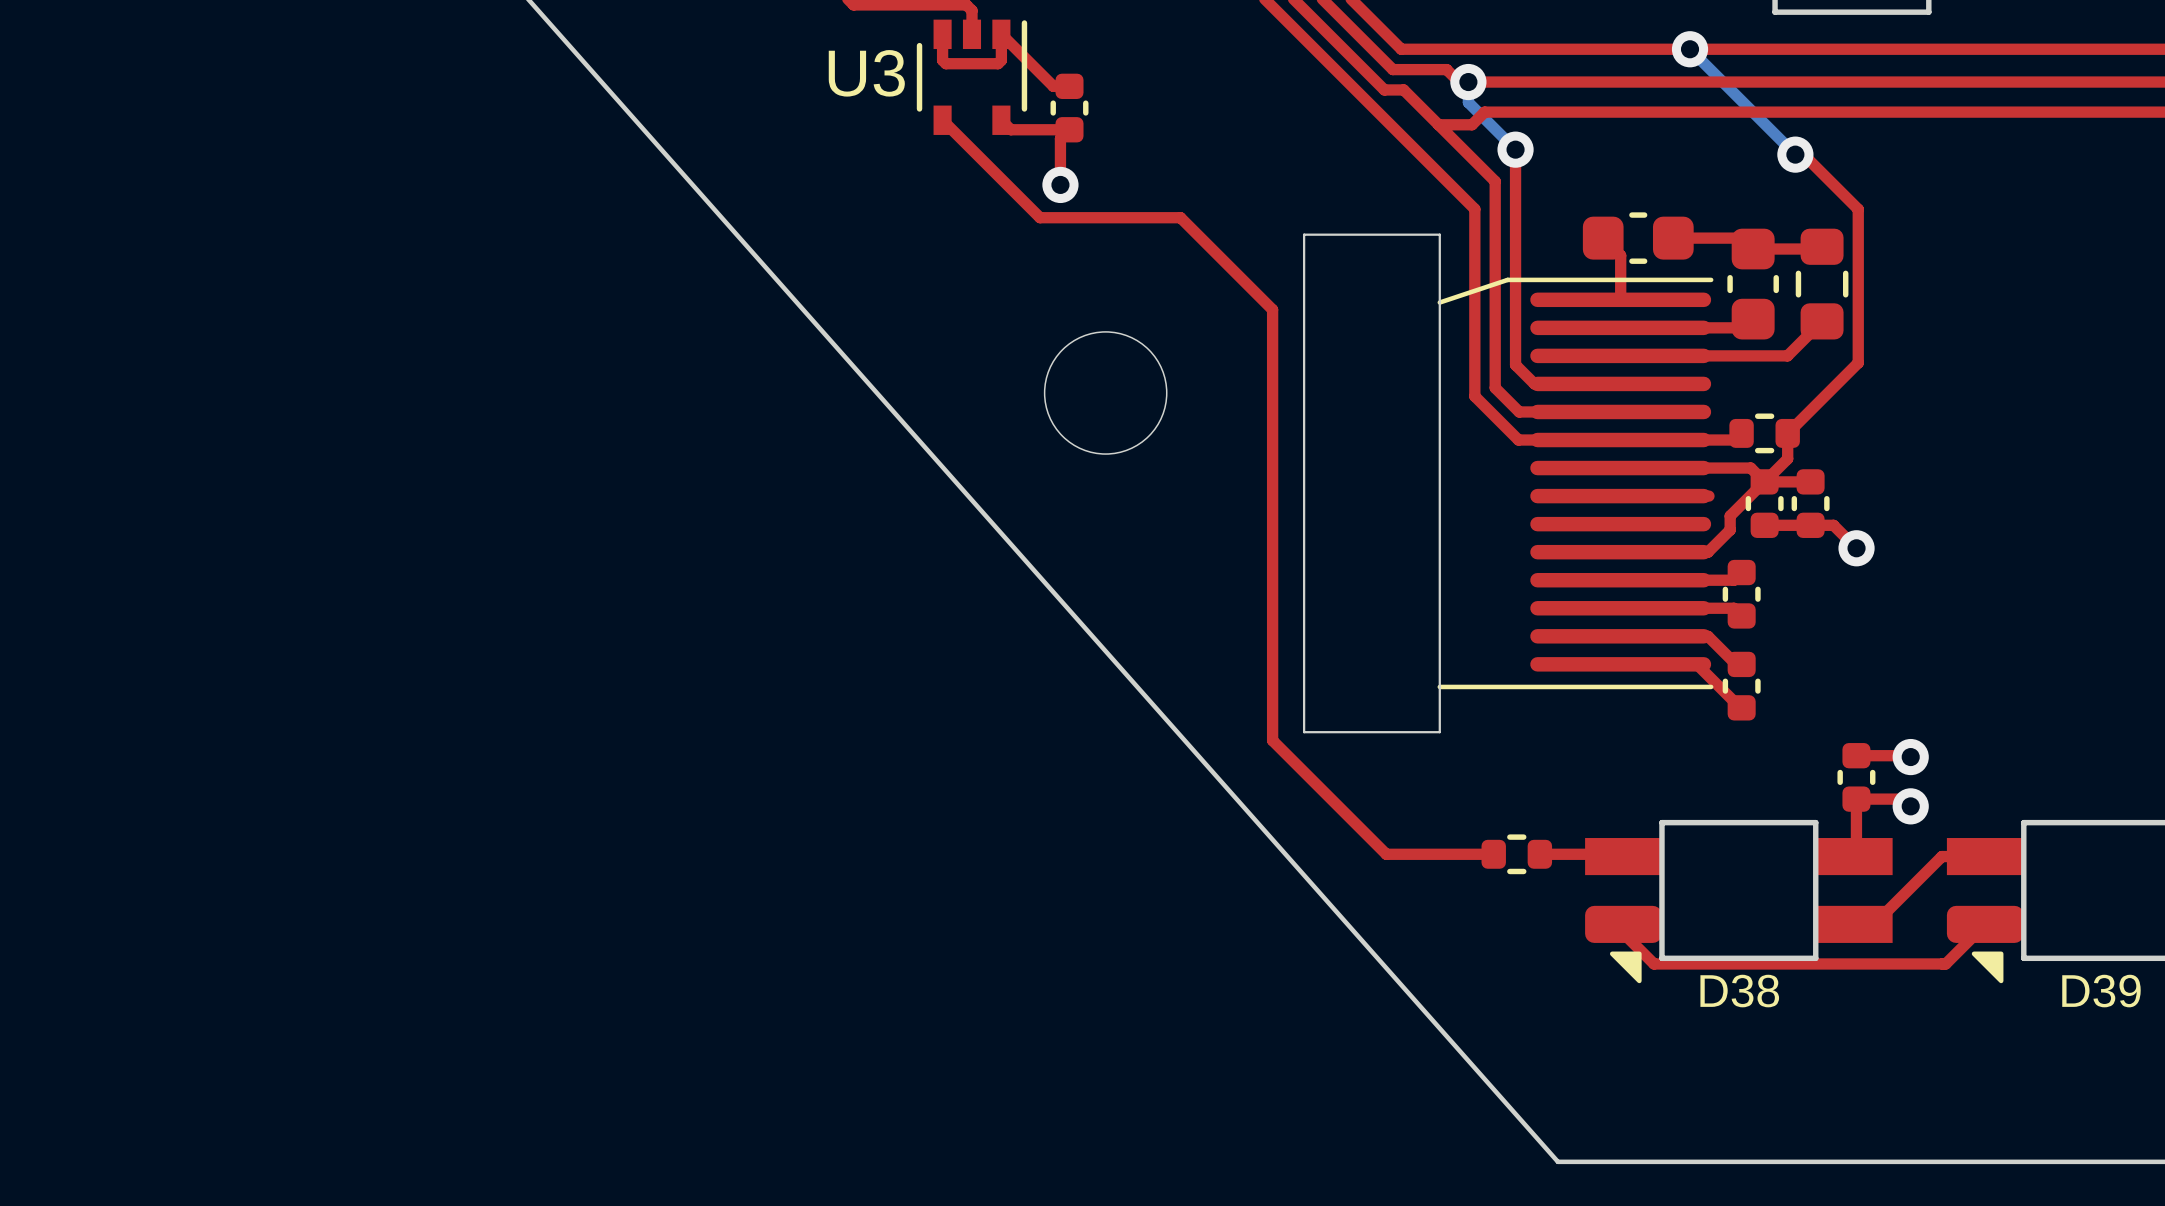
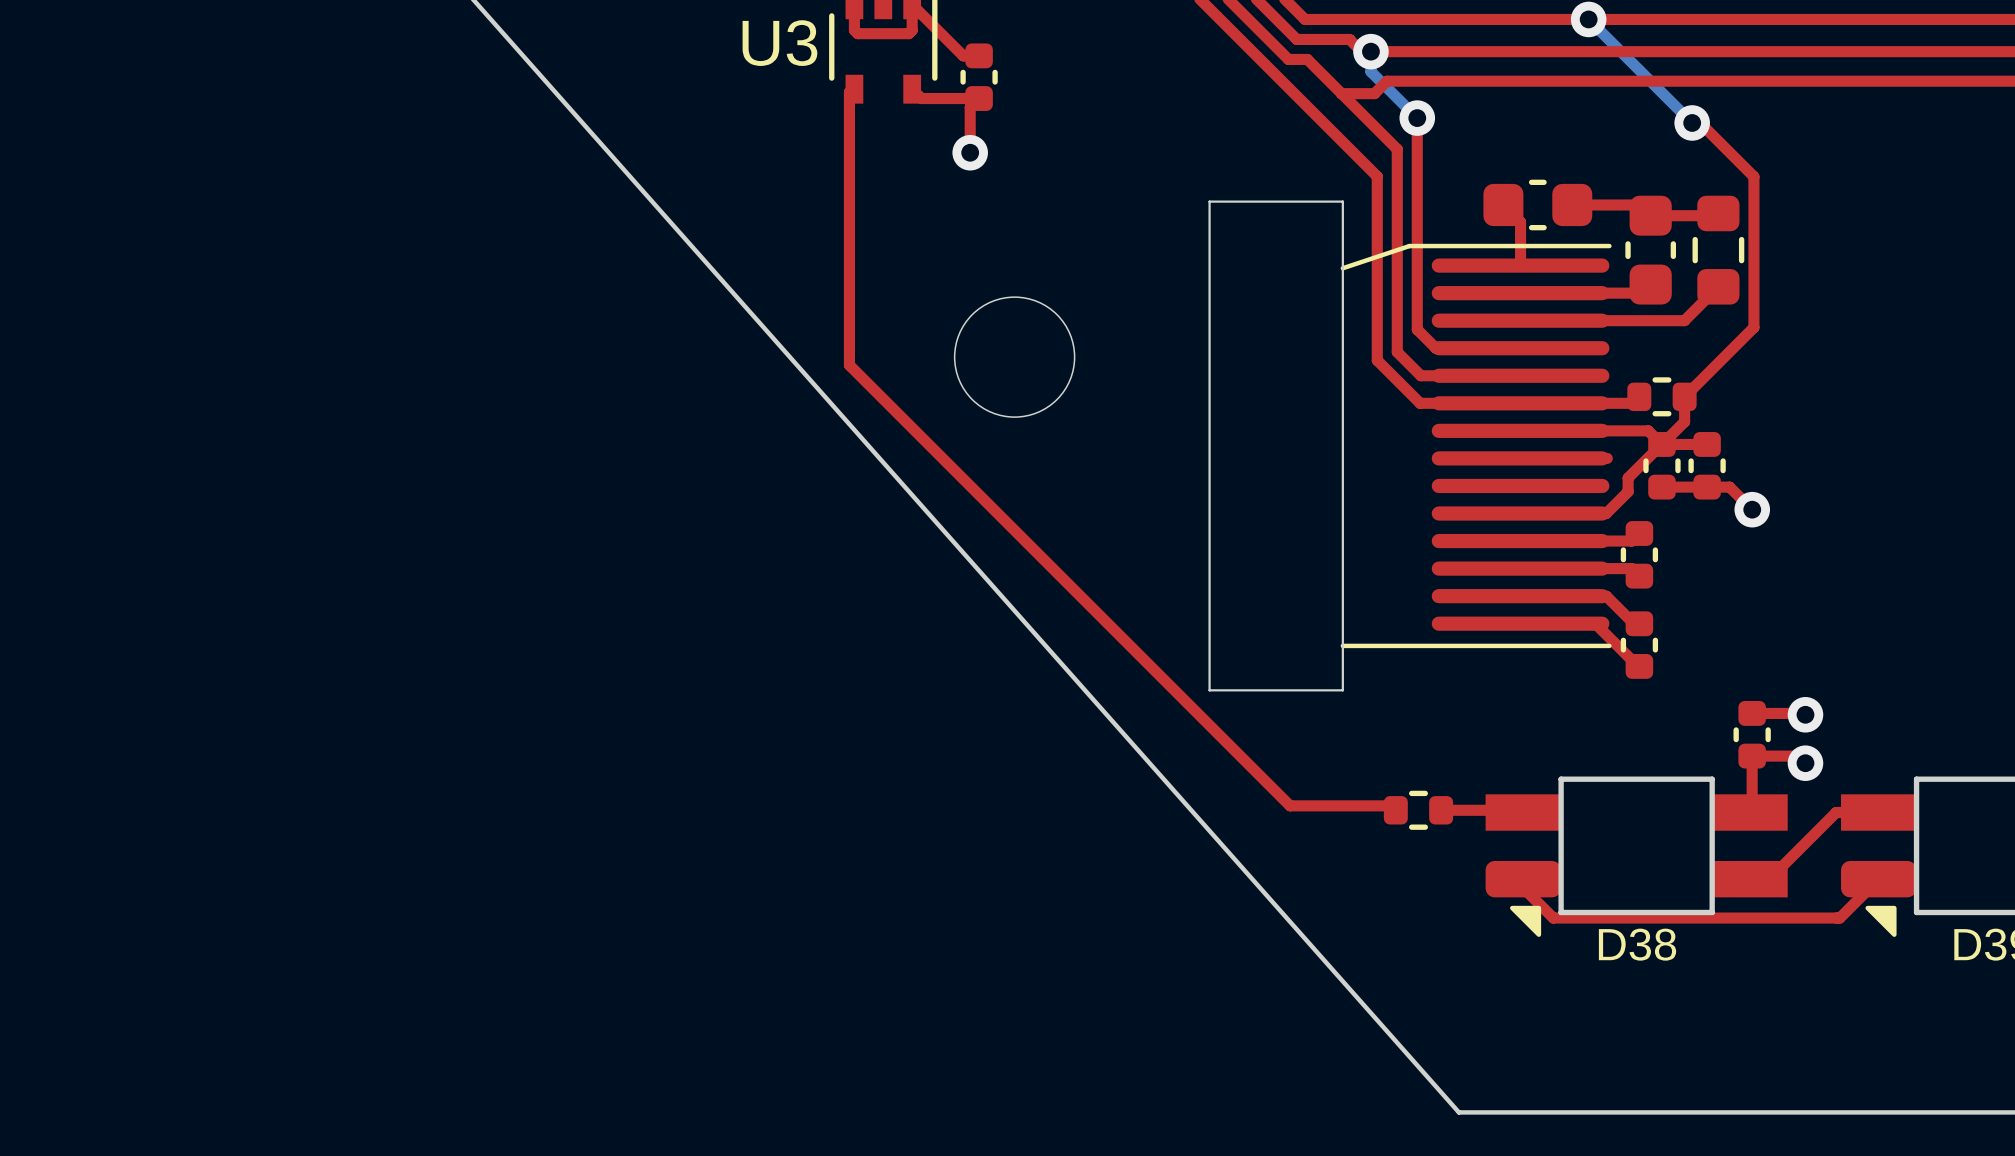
top track: (942, 120) (1040, 217) (1180, 217) (1272, 309) (1272, 740) (1386, 854) (1493, 854) -> (854, 89) (849, 92) (849, 365) (1290, 805) (1391, 805) (1395, 810)

